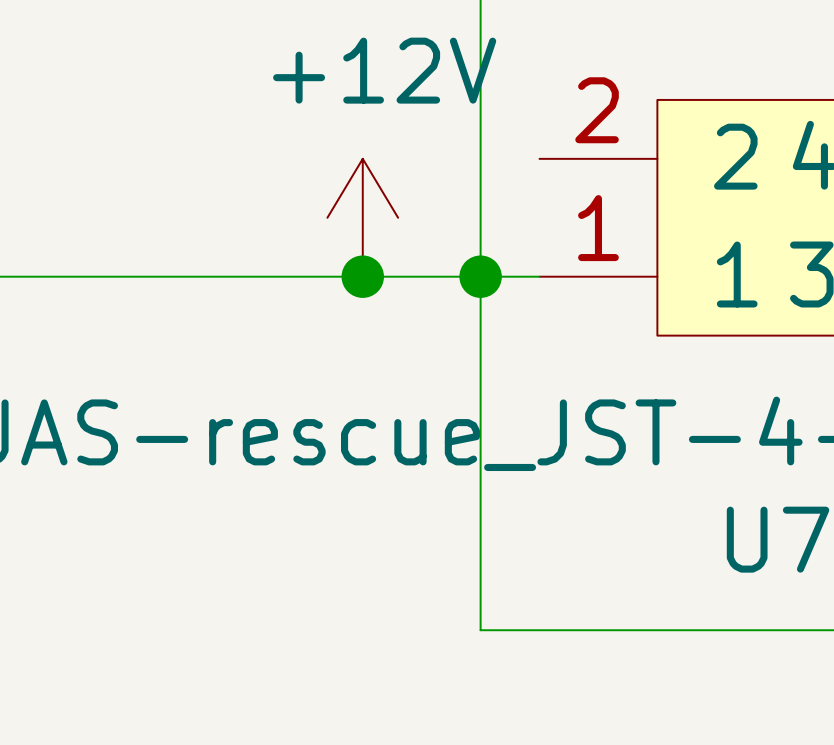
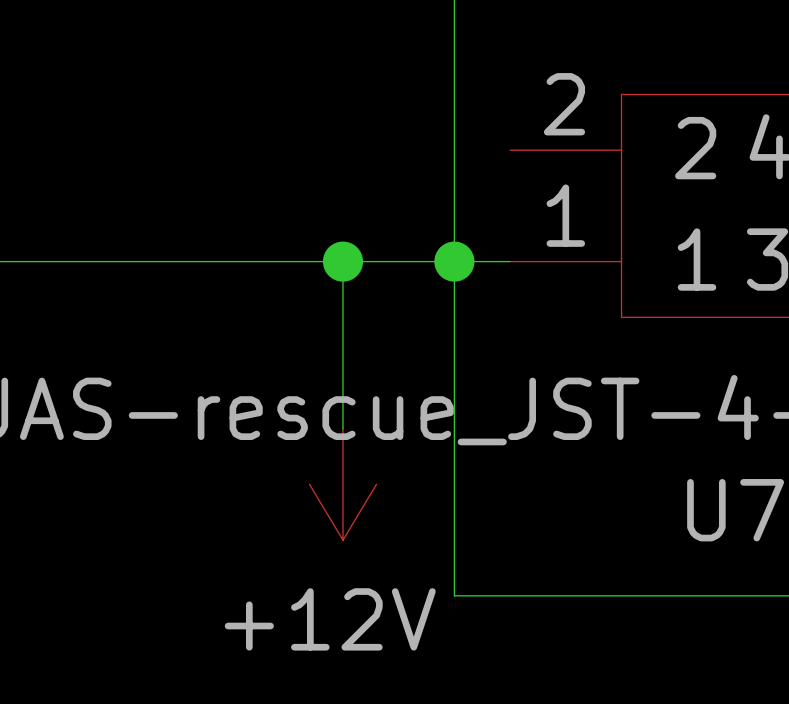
power symbol rotation: 0° (362, 217) -> 180° (342, 484)
power symbol position: +12V (362, 217) -> +12V (342, 484)
wire: none -> (342, 261) (342, 428)

